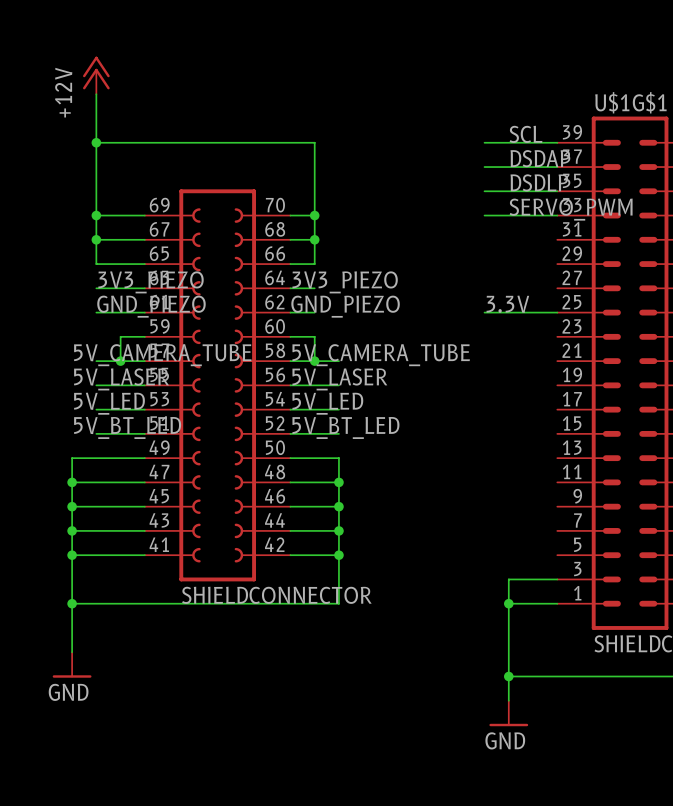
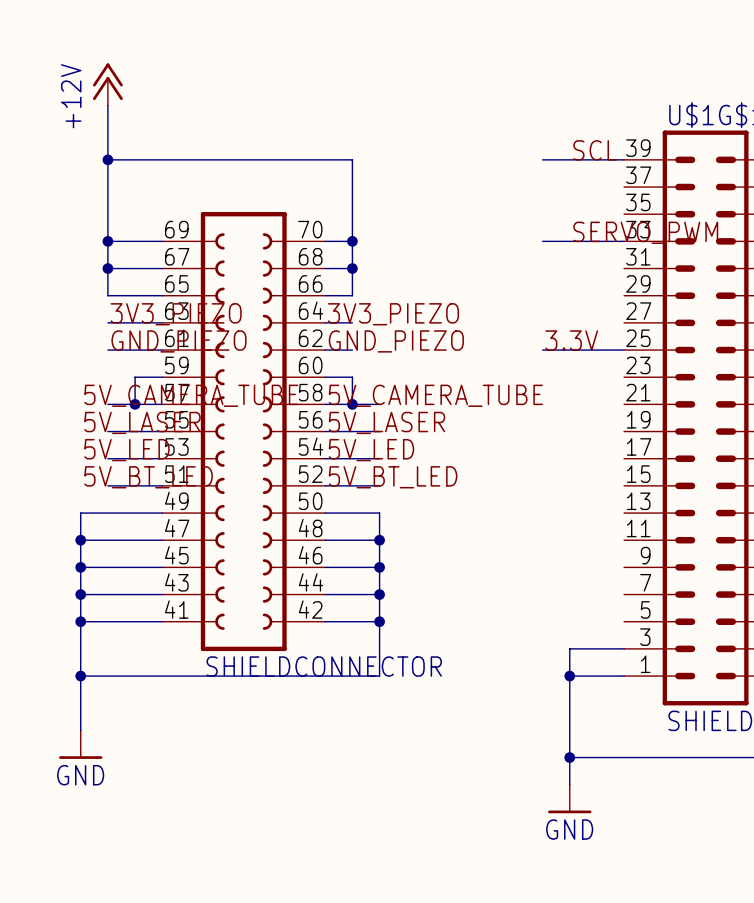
label: DSDAP (540, 158) -> none
wire: (484, 167) (557, 167) -> none
label: DSDLP (539, 182) -> none
wire: (484, 191) (557, 191) -> none

